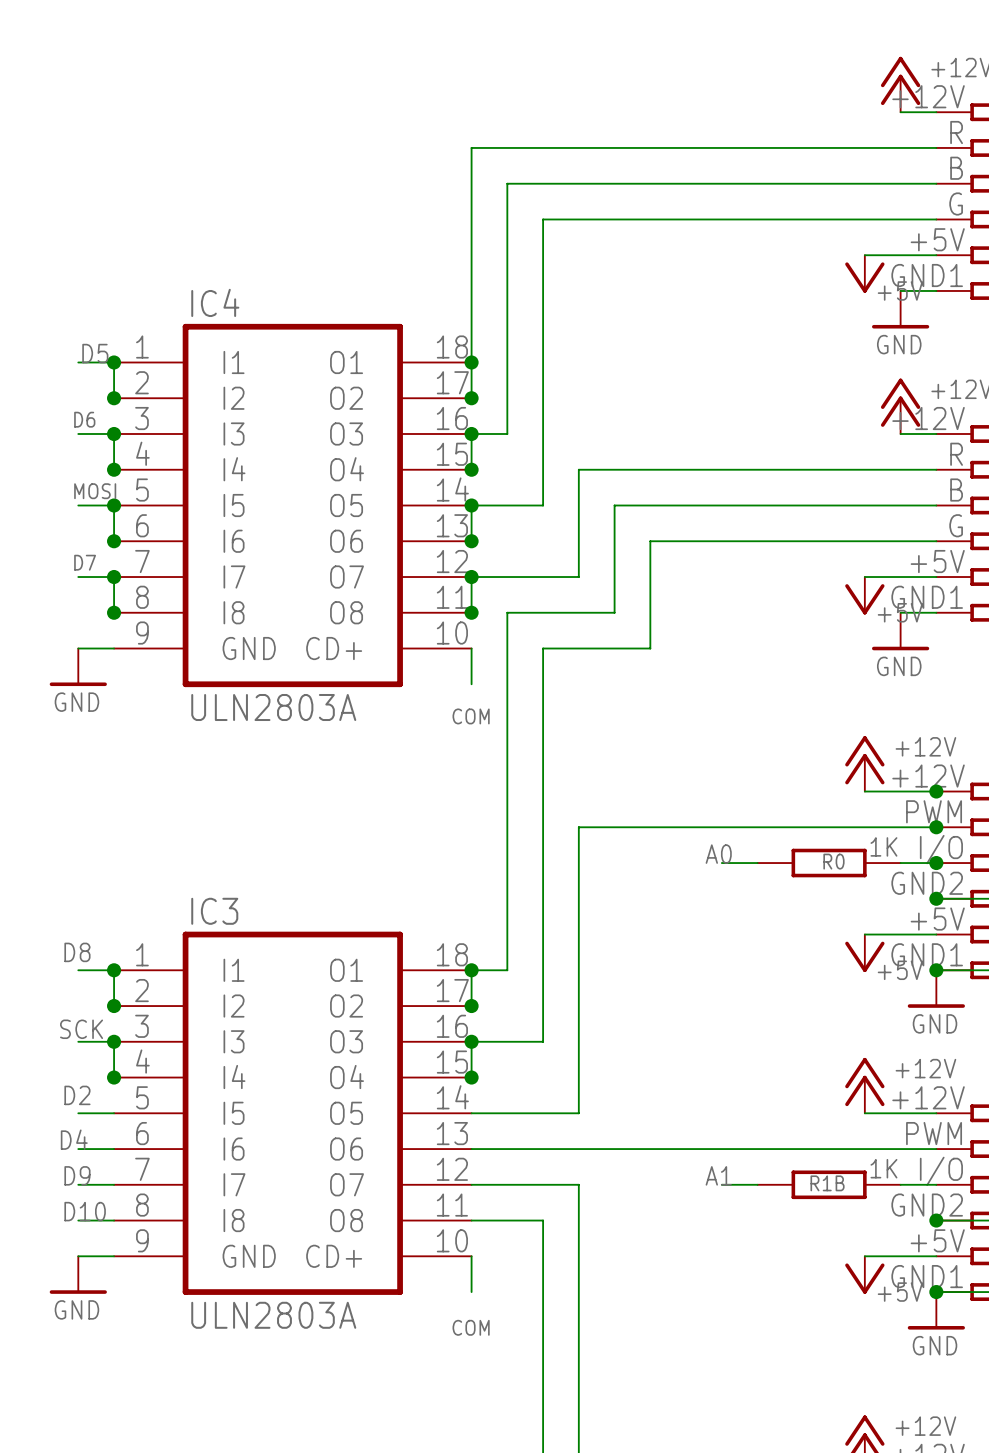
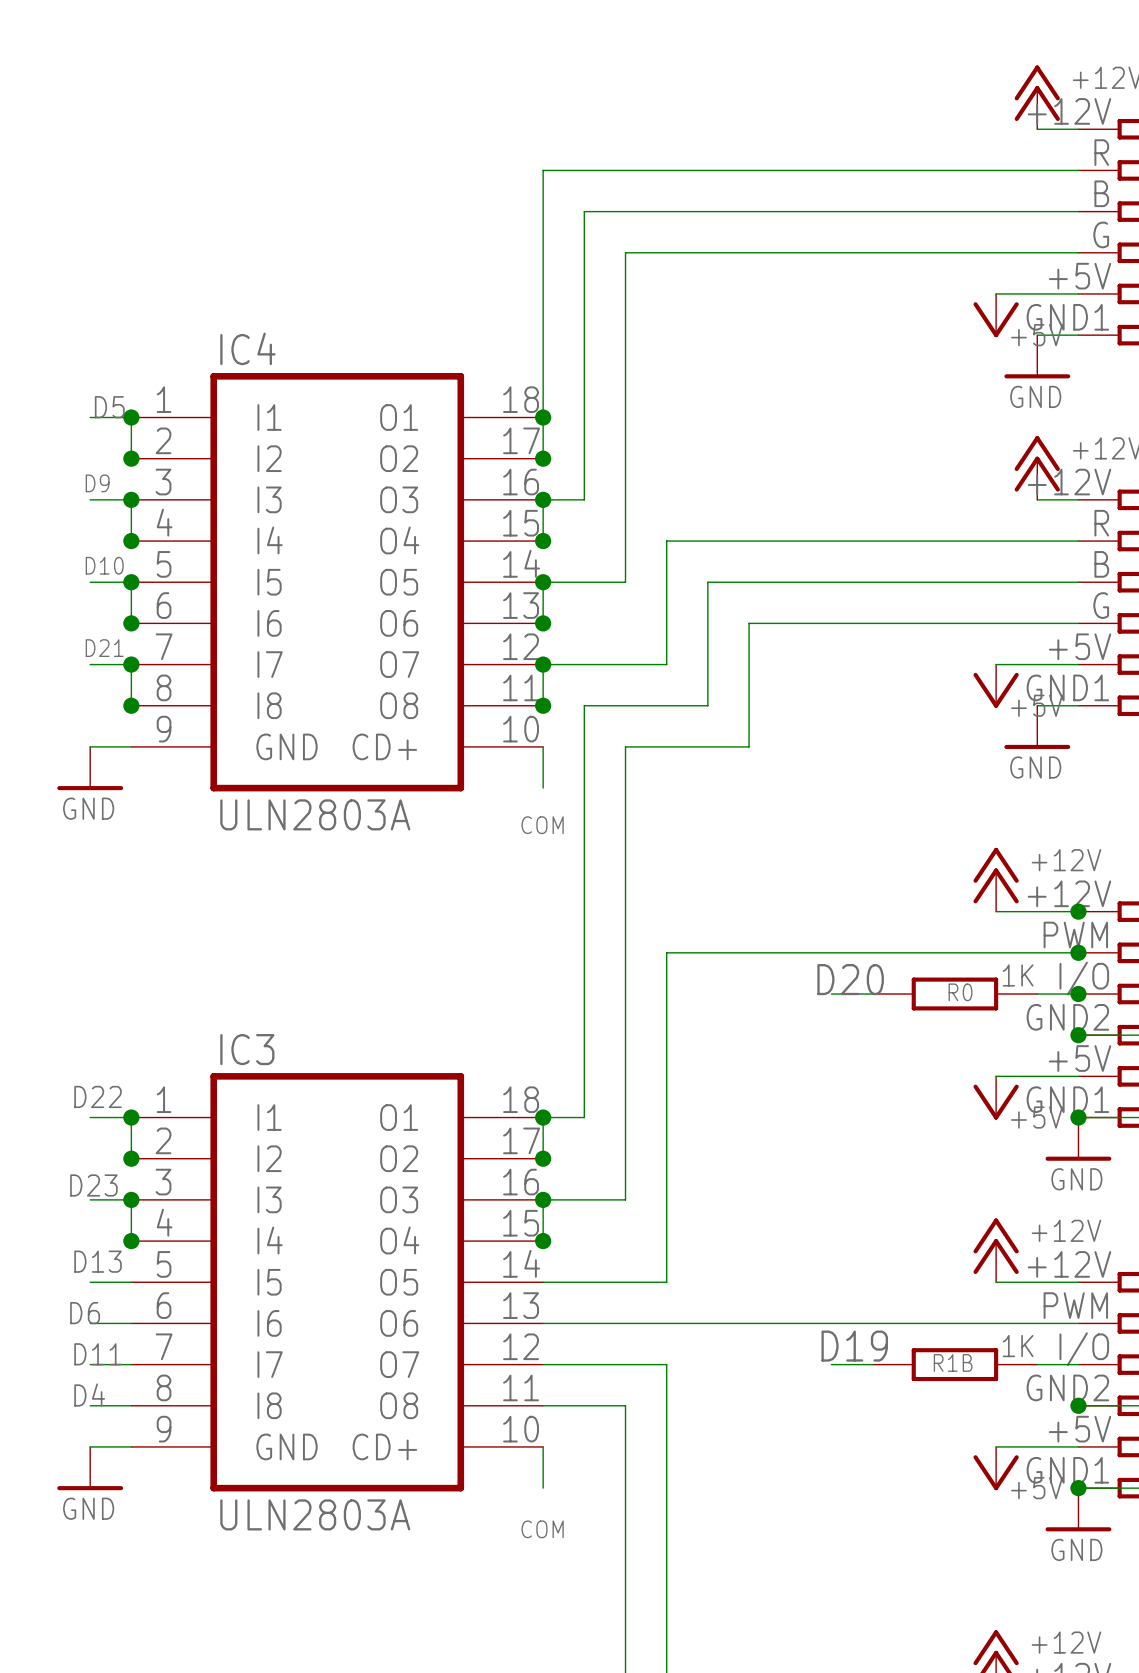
label: D6 (84, 419) -> D9 (97, 483)
label: MOSI (95, 491) -> D10 (104, 565)
label: D7 (85, 562) -> D21 (104, 648)
label: A0 (718, 854) -> D20 (850, 979)
label: D8 (77, 952) -> D22 (98, 1096)
label: SCK (81, 1029) -> D23 (93, 1185)
label: D2 (77, 1095) -> D13 (98, 1261)
label: D4 (74, 1139) -> D6 (85, 1313)
label: D9 (77, 1175) -> D11 (98, 1354)
label: A1 (718, 1175) -> D19 (854, 1346)
label: D10 (85, 1211) -> D4 (89, 1395)

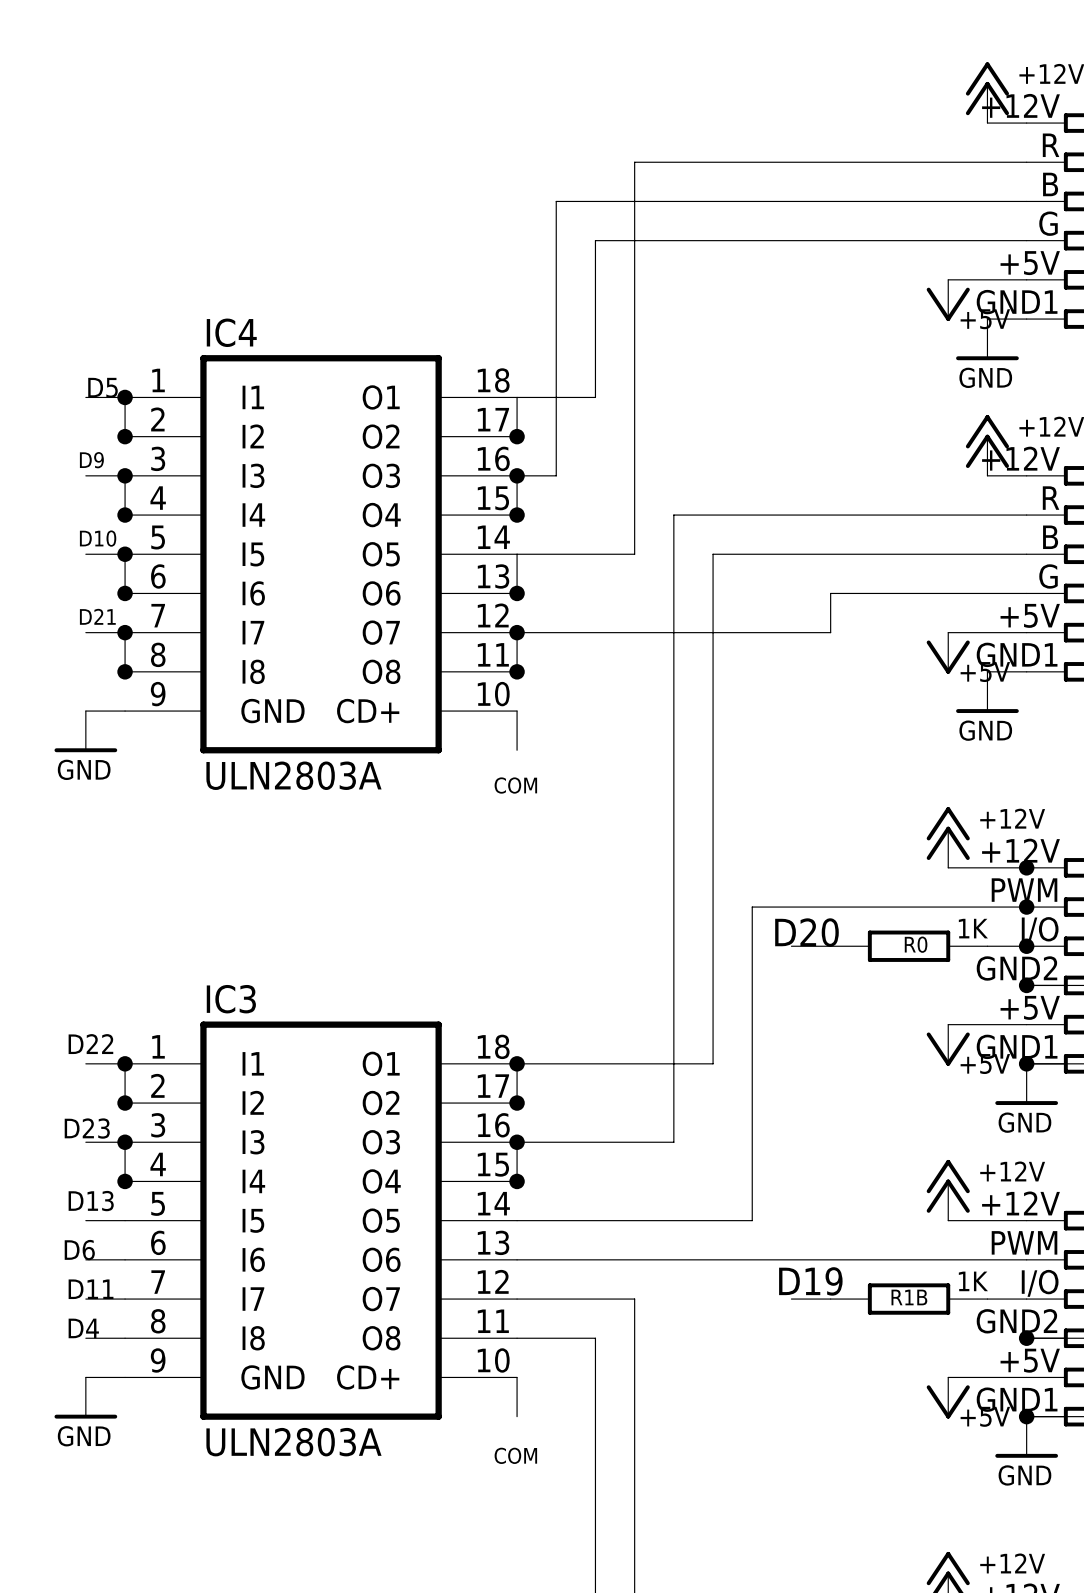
wire: (666, 170) (543, 170) (543, 417) -> (634, 162) (634, 515)
junction: (543, 417) -> none
wire: (625, 417) (625, 582) -> (595, 397) (517, 397)
wire: (666, 541) (707, 541) -> none
junction: (543, 582) -> none
wire: (666, 582) (666, 664) -> (634, 554) (595, 554)
wire: (707, 582) (749, 582) -> (673, 554) (673, 515)
wire: none -> (713, 554) (713, 593)
wire: (749, 623) (872, 623) -> (634, 632) (830, 632) (830, 593)
wire: (707, 705) (584, 705) (584, 1117) -> (713, 711) (713, 1063) (556, 1063)
wire: (749, 746) (625, 746) (625, 1199) -> (673, 671) (673, 1142) (595, 1142)
wire: (790, 952) (666, 952) (666, 1282) -> (752, 907) (752, 1220) (634, 1220)

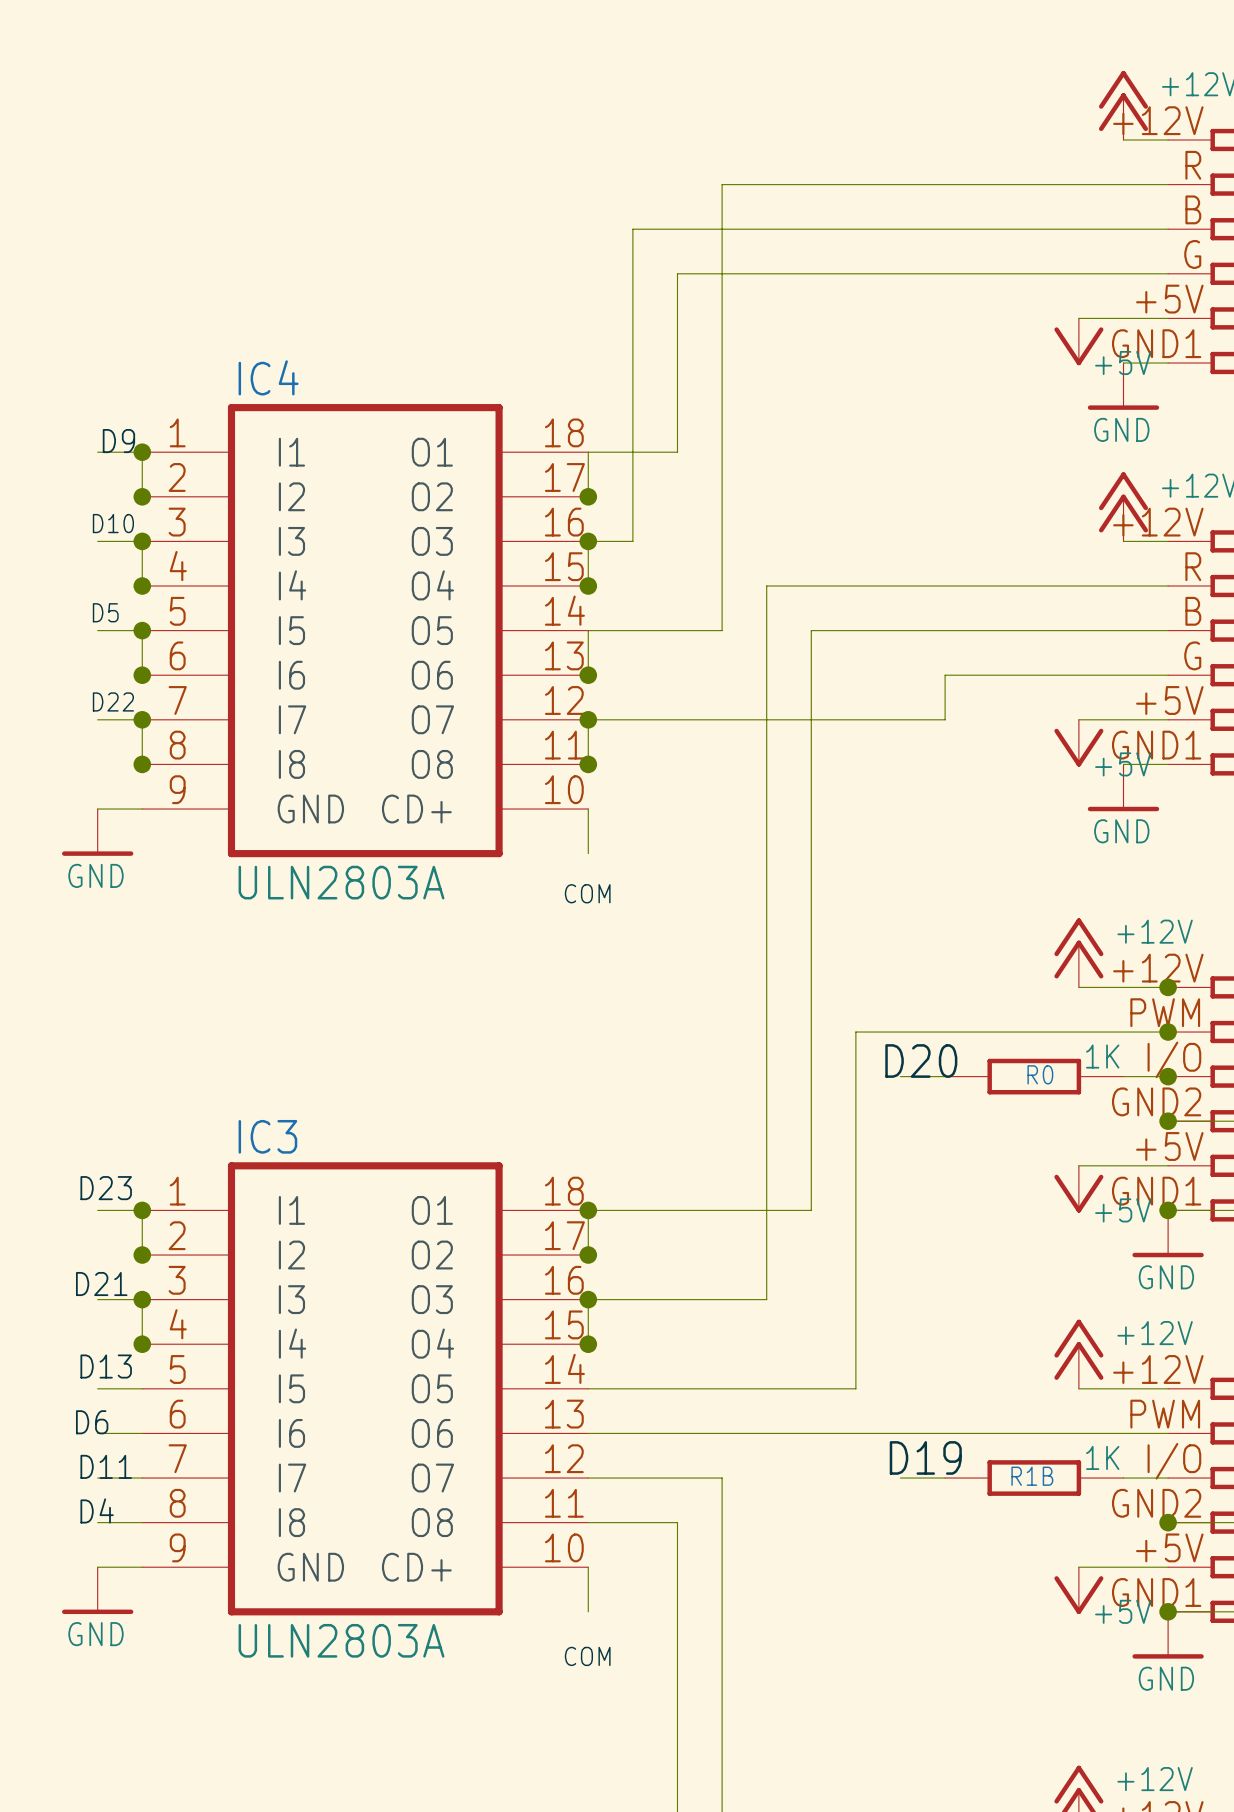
label: D5 (102, 387) -> D9 (118, 441)
label: D9 (91, 460) -> D10 (113, 523)
label: D10 (98, 538) -> D5 (105, 612)
label: D21 (97, 616) -> D22 (113, 701)
label: D22 (90, 1044) -> D23 (106, 1188)
label: D23 (87, 1128) -> D21 (101, 1284)

